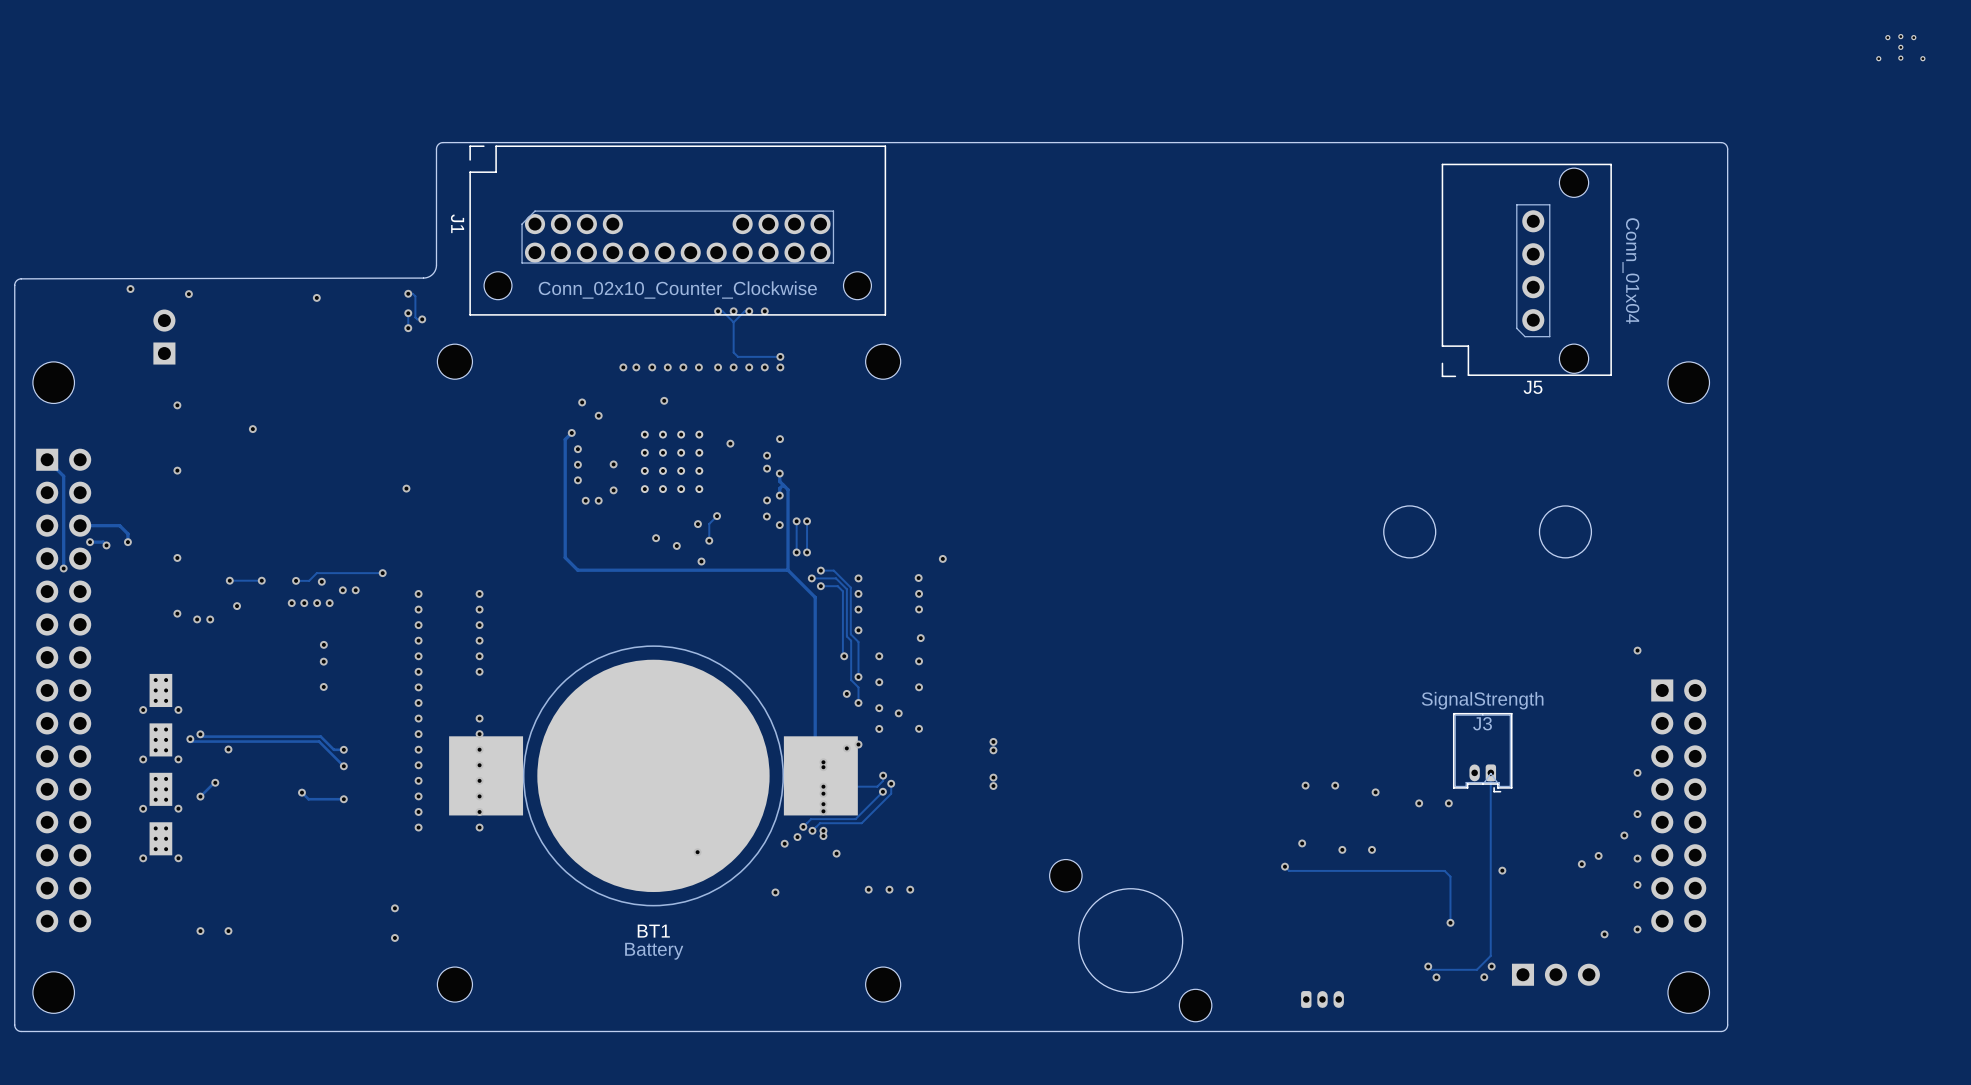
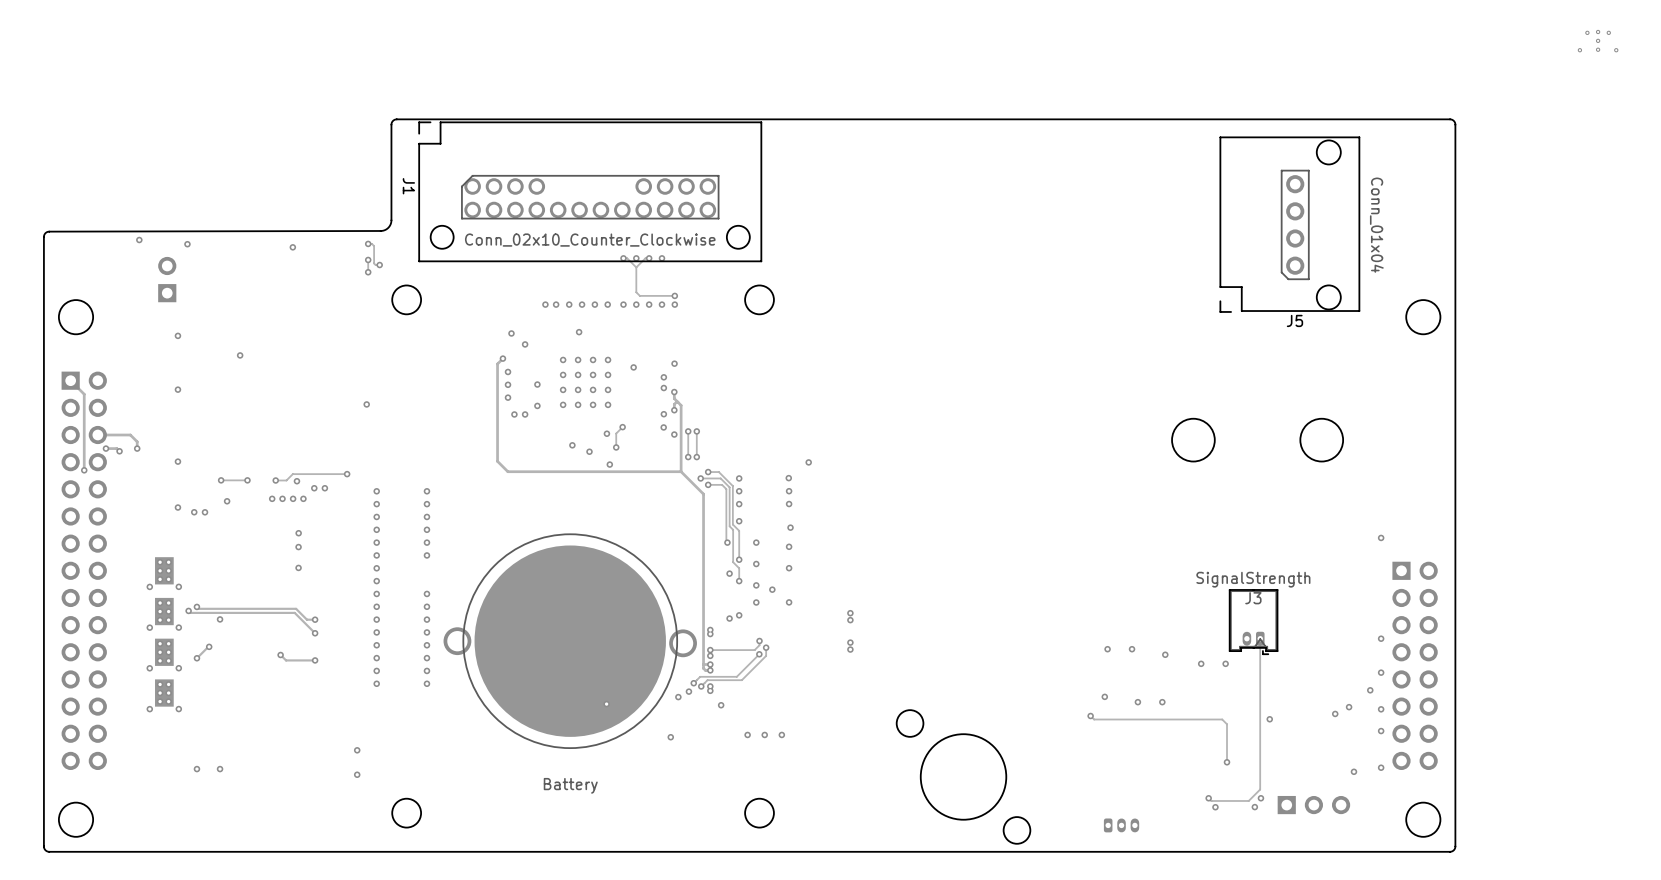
BT1: Battery (653, 775) -> none
part: none -> Battery (570, 641)

